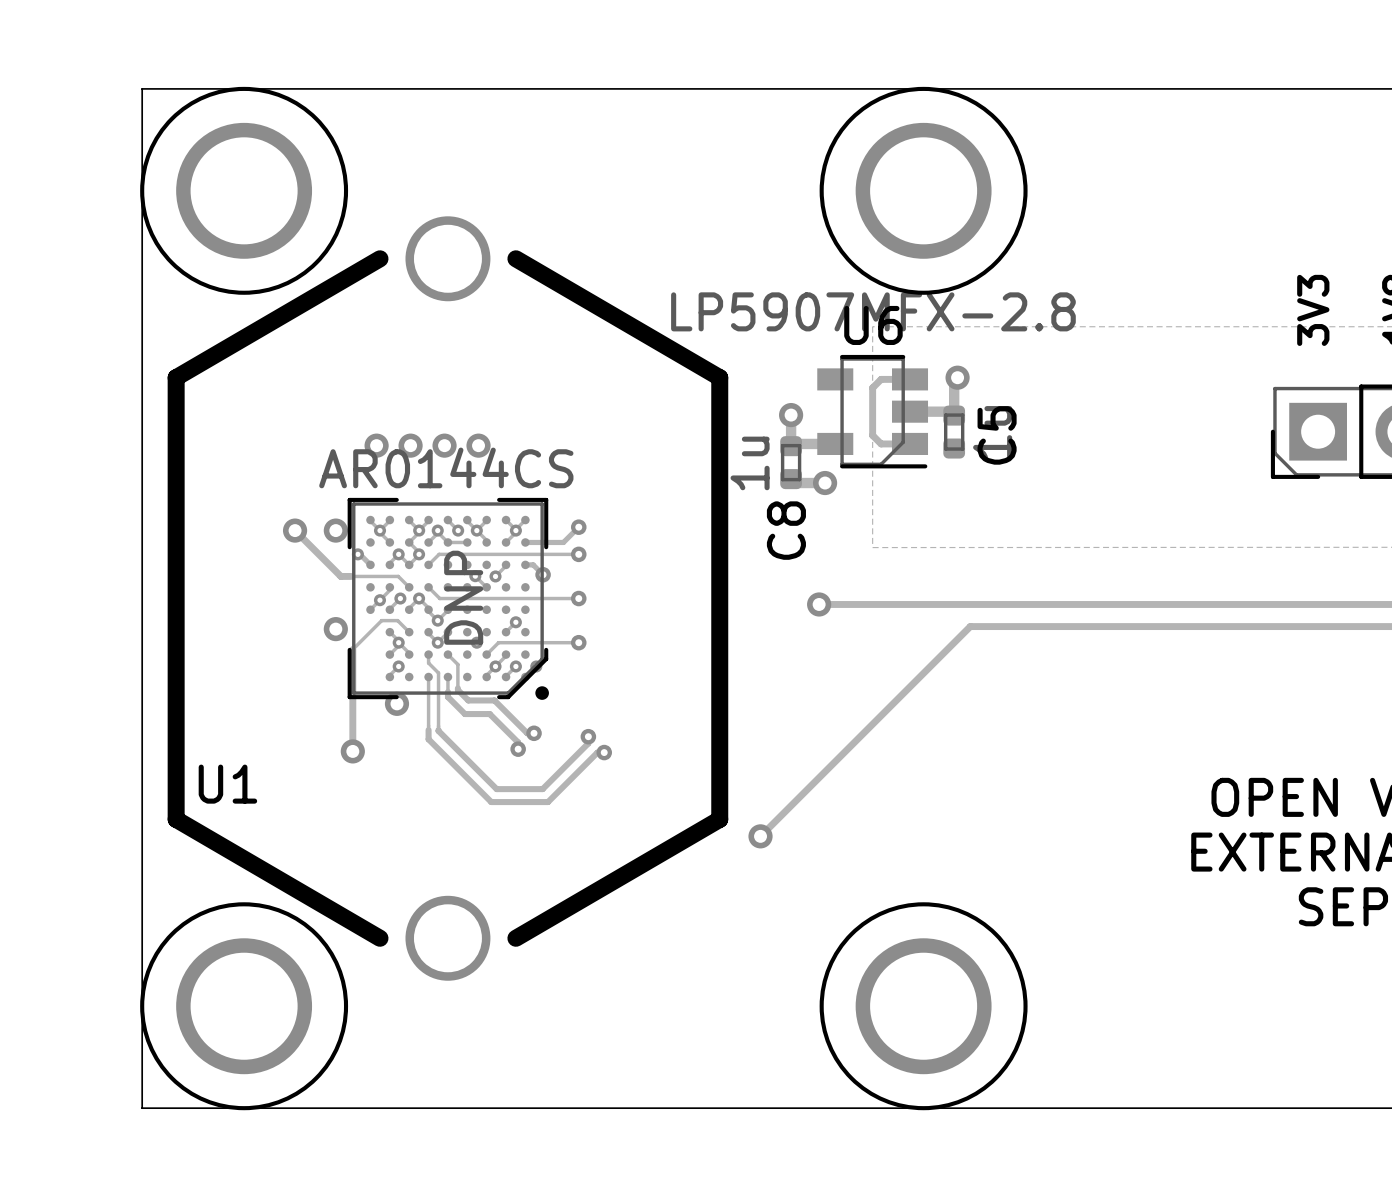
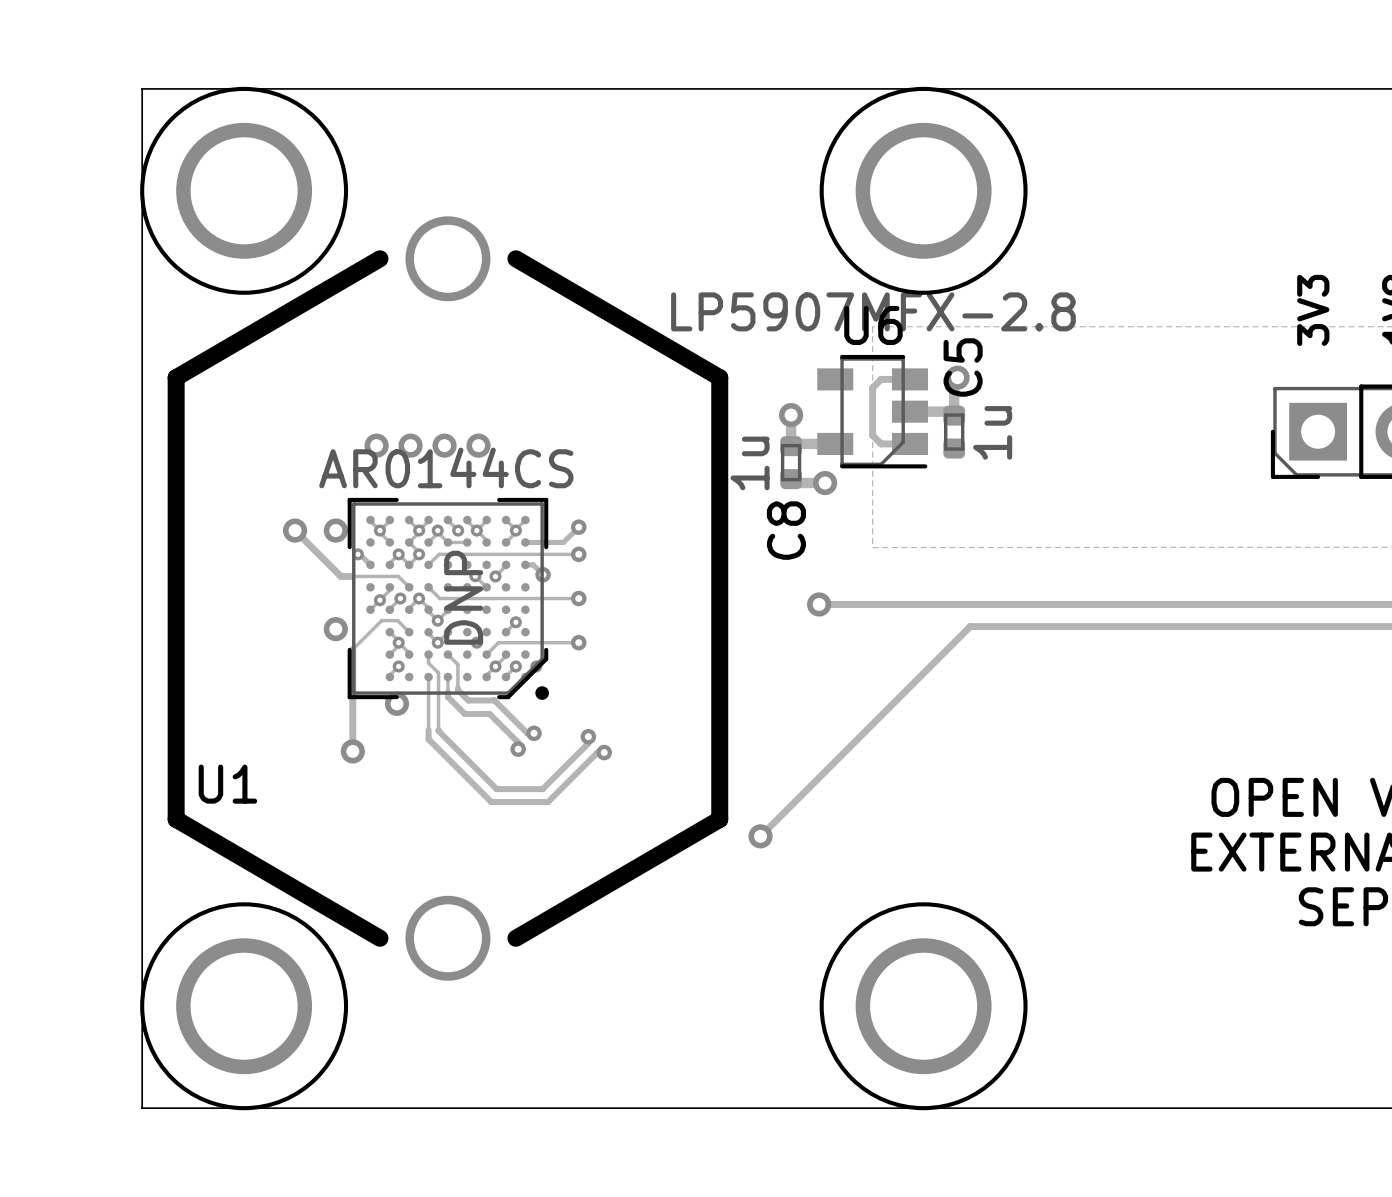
C5 name position: C5 (997, 435) -> C5 (963, 367)

